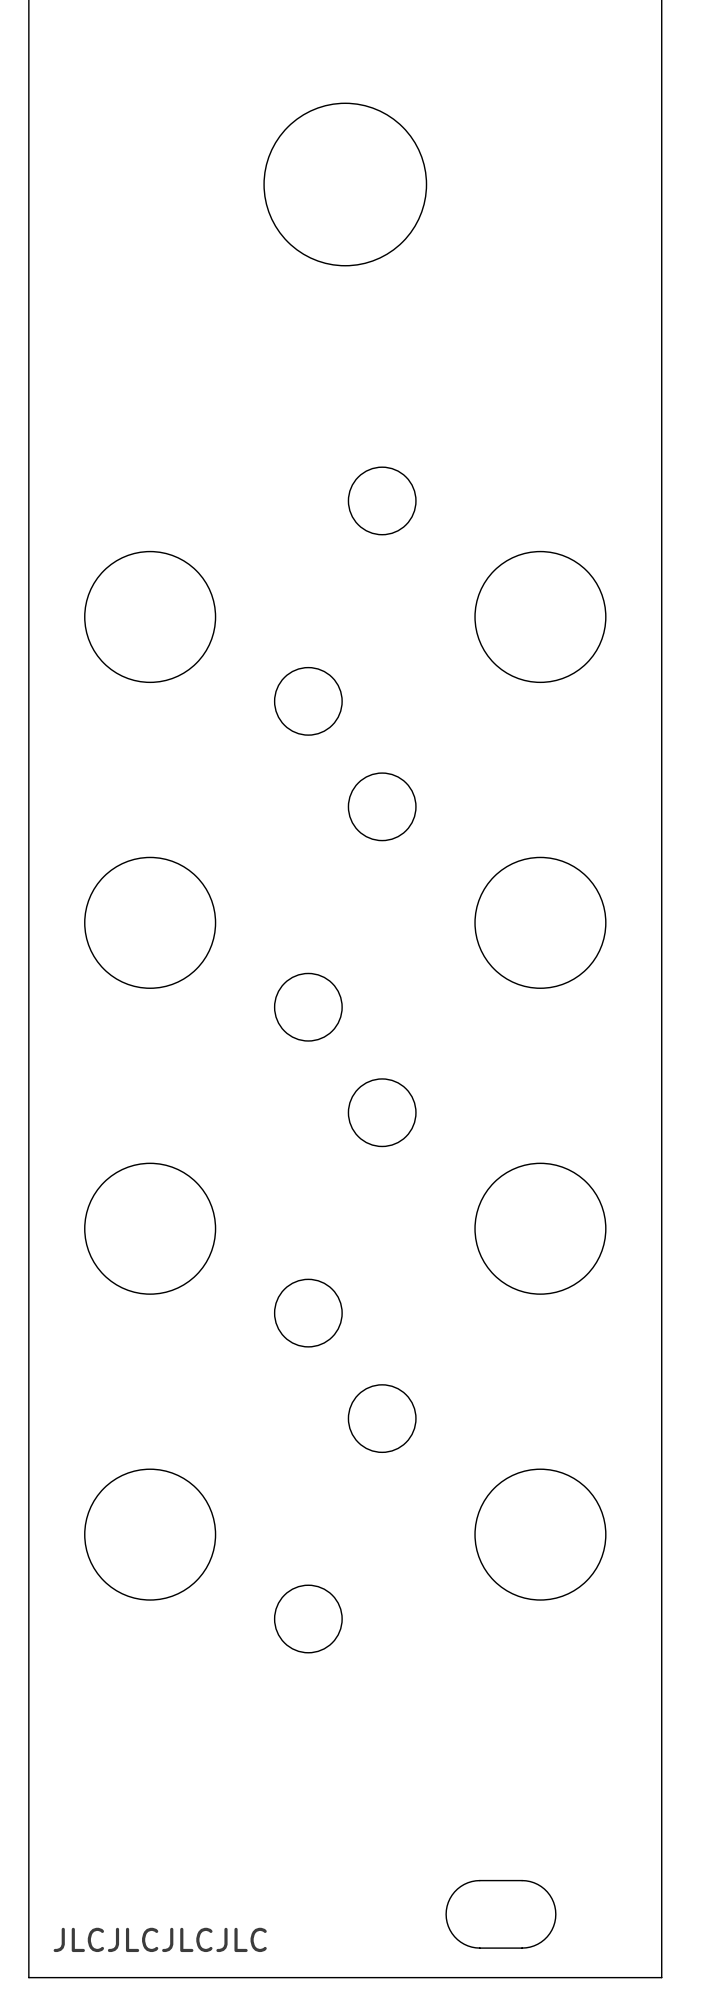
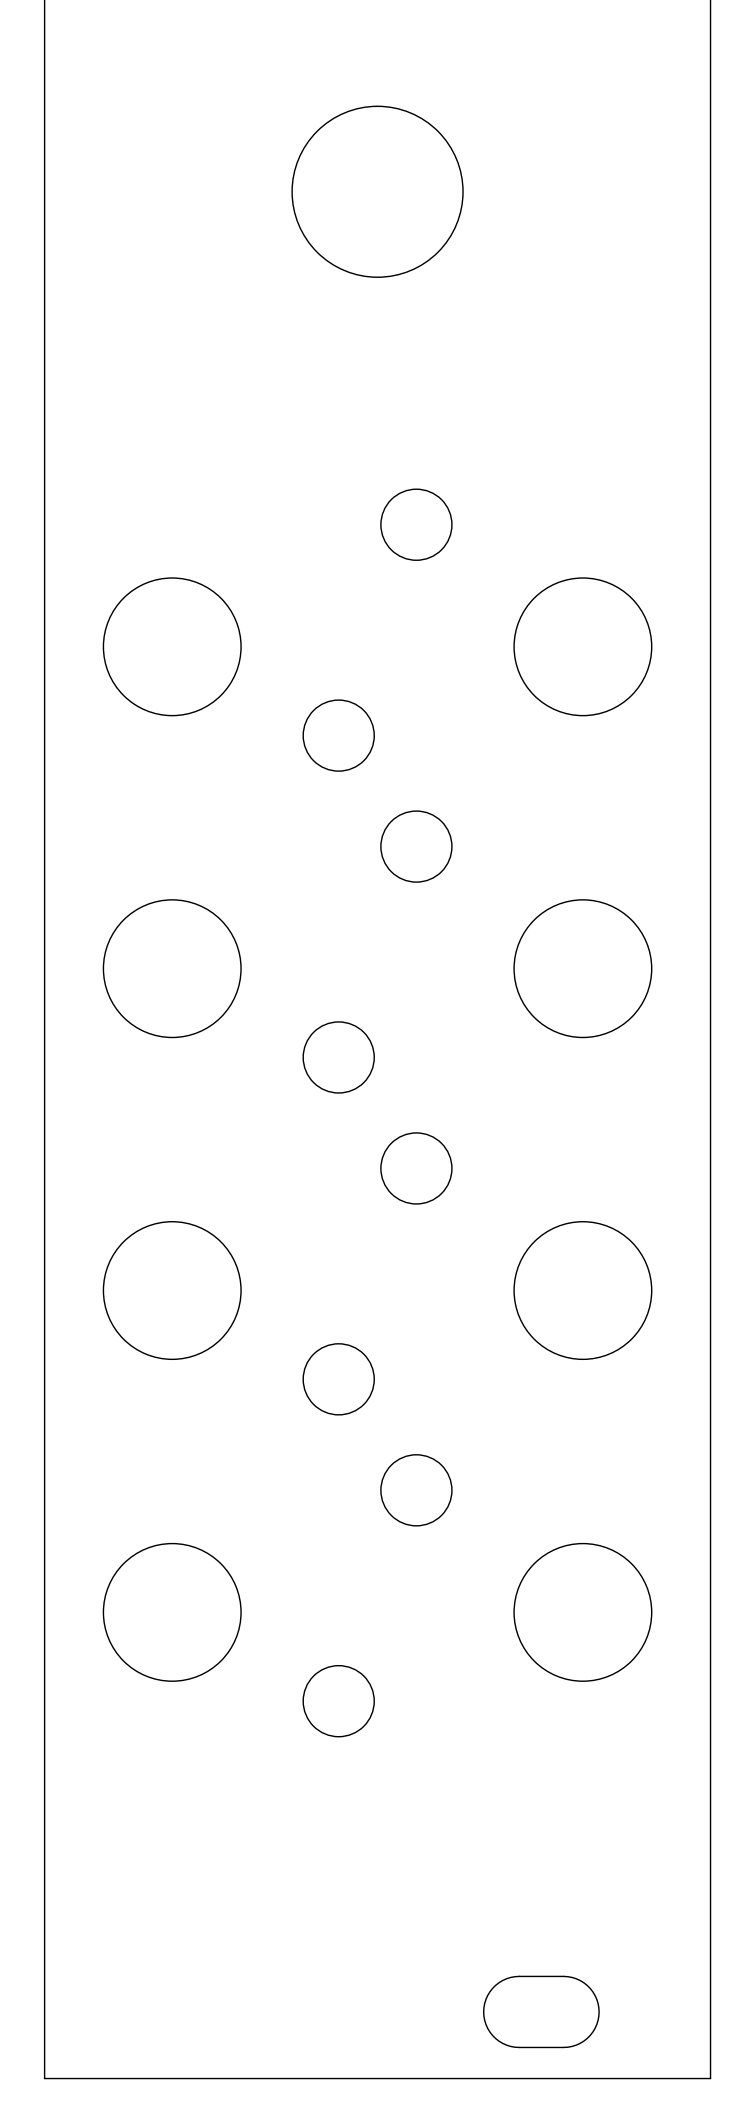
text: JLCJLCJLCJLC (160, 1939) -> none

